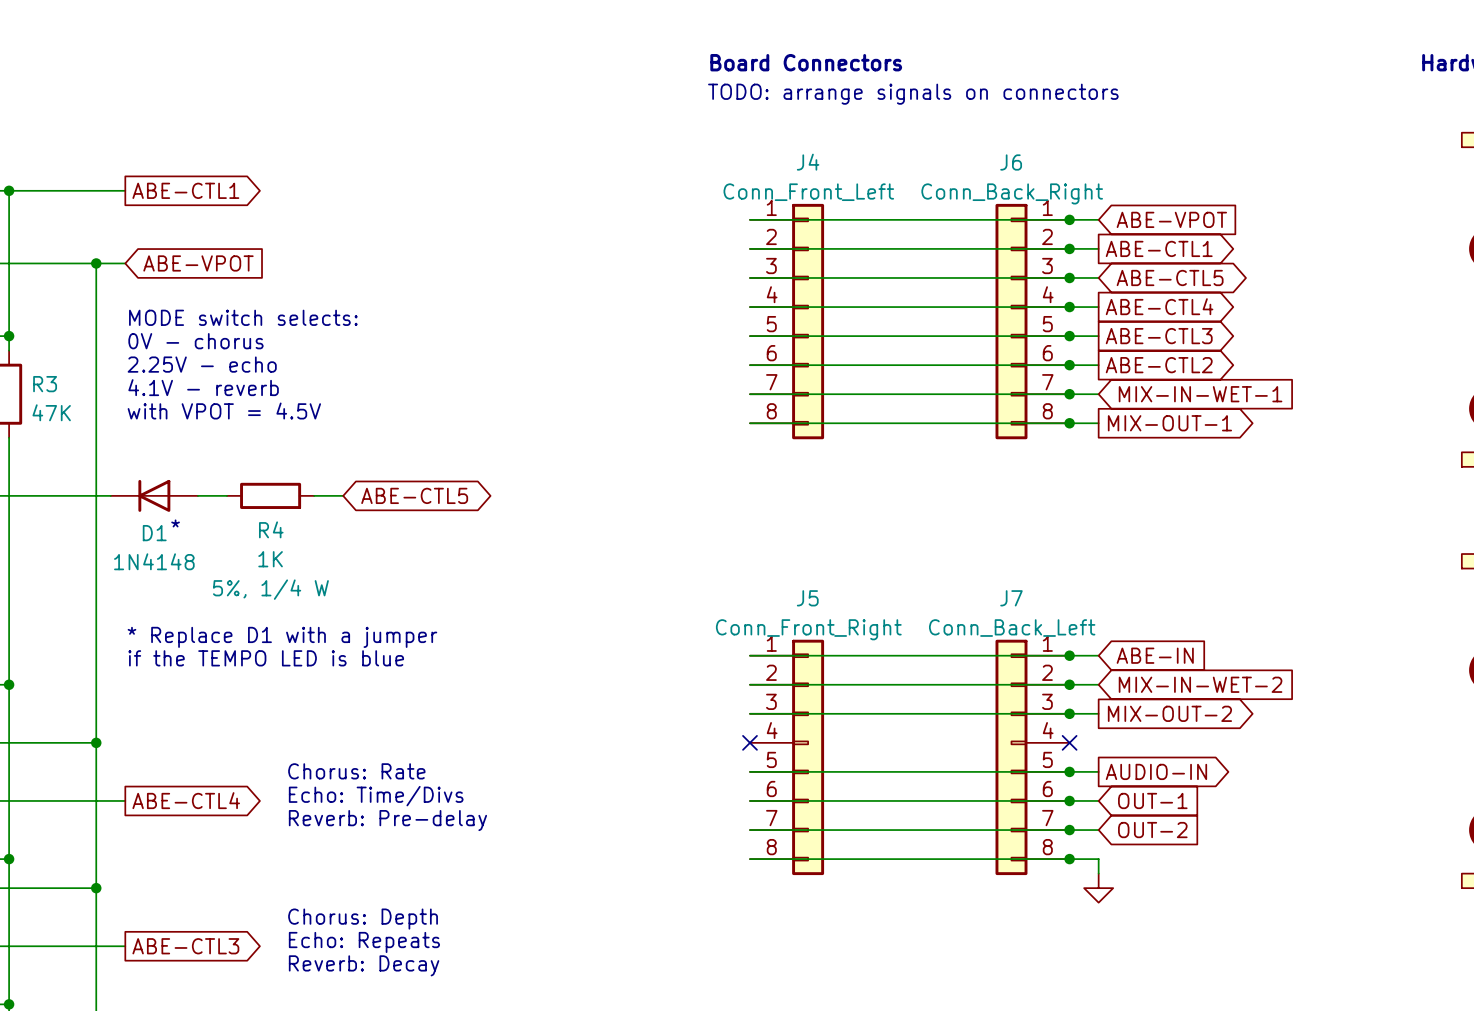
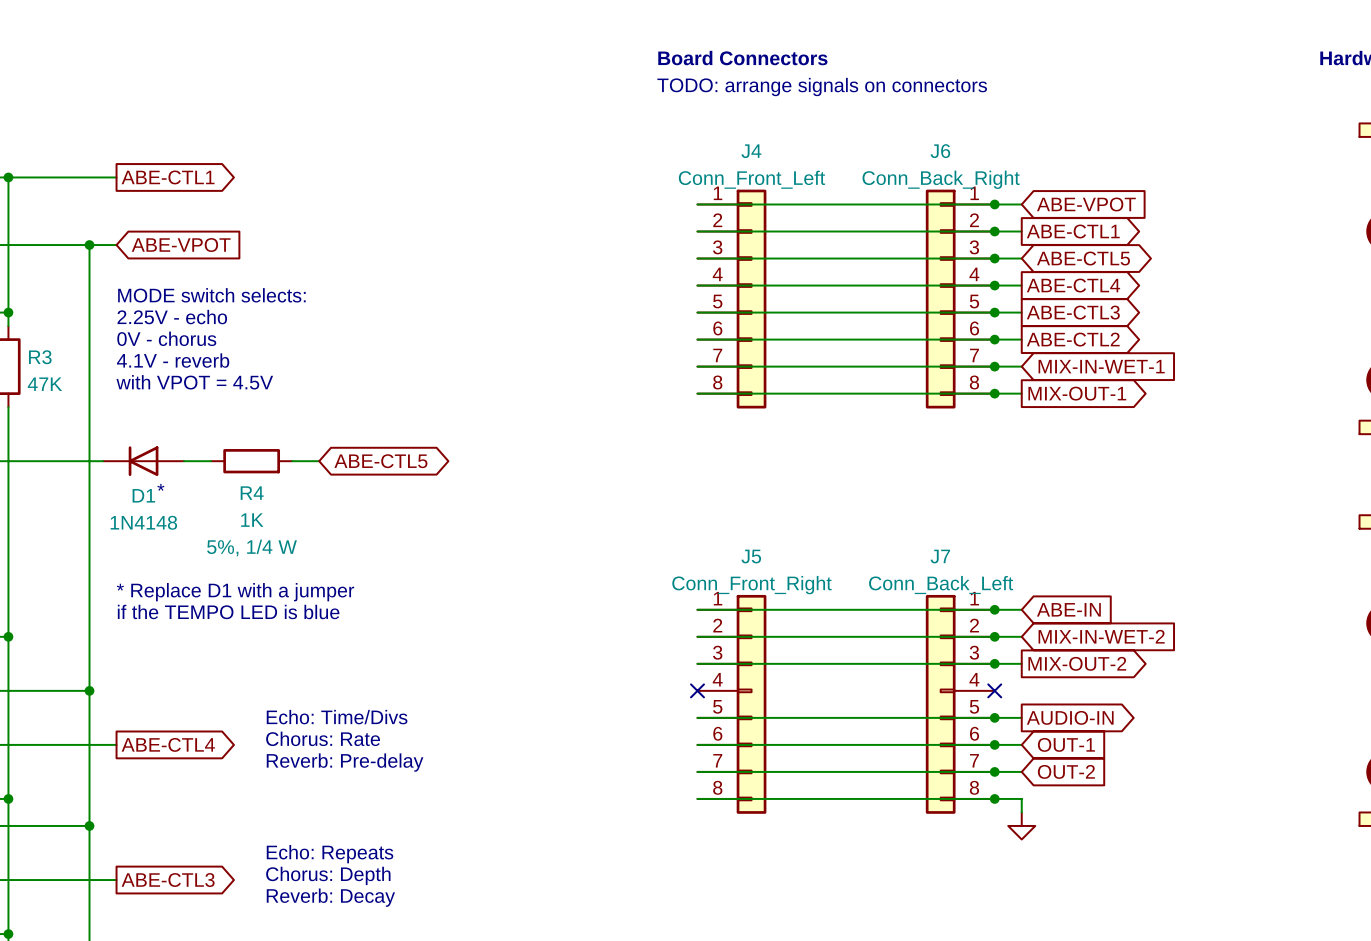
text: 0V - chorus (195, 341) -> 2.25V - echo (172, 317)
text: 2.25V - echo (202, 364) -> 0V - chorus (166, 338)
text: Chorus: Rate (356, 771) -> Echo: Time/Divs (337, 717)
text: Echo: Time/Divs (376, 796) -> Chorus: Rate (323, 738)
text: Chorus: Depth (363, 919) -> Echo: Repeats (330, 854)
text: Echo: Repeats (364, 942) -> Chorus: Depth (328, 875)

